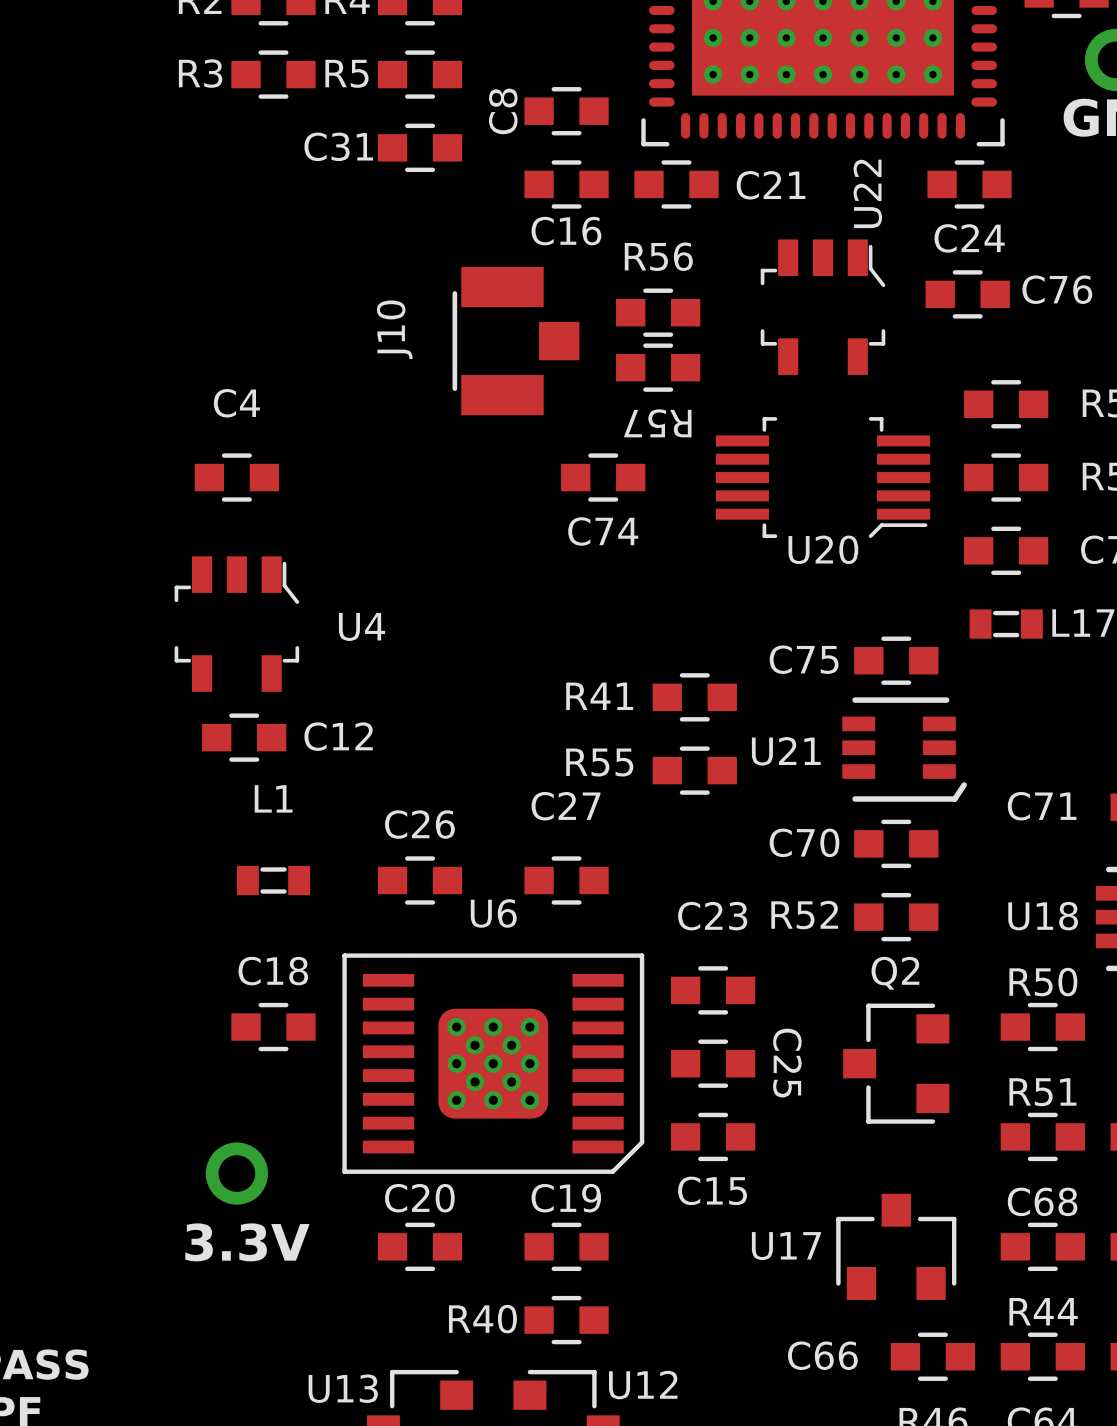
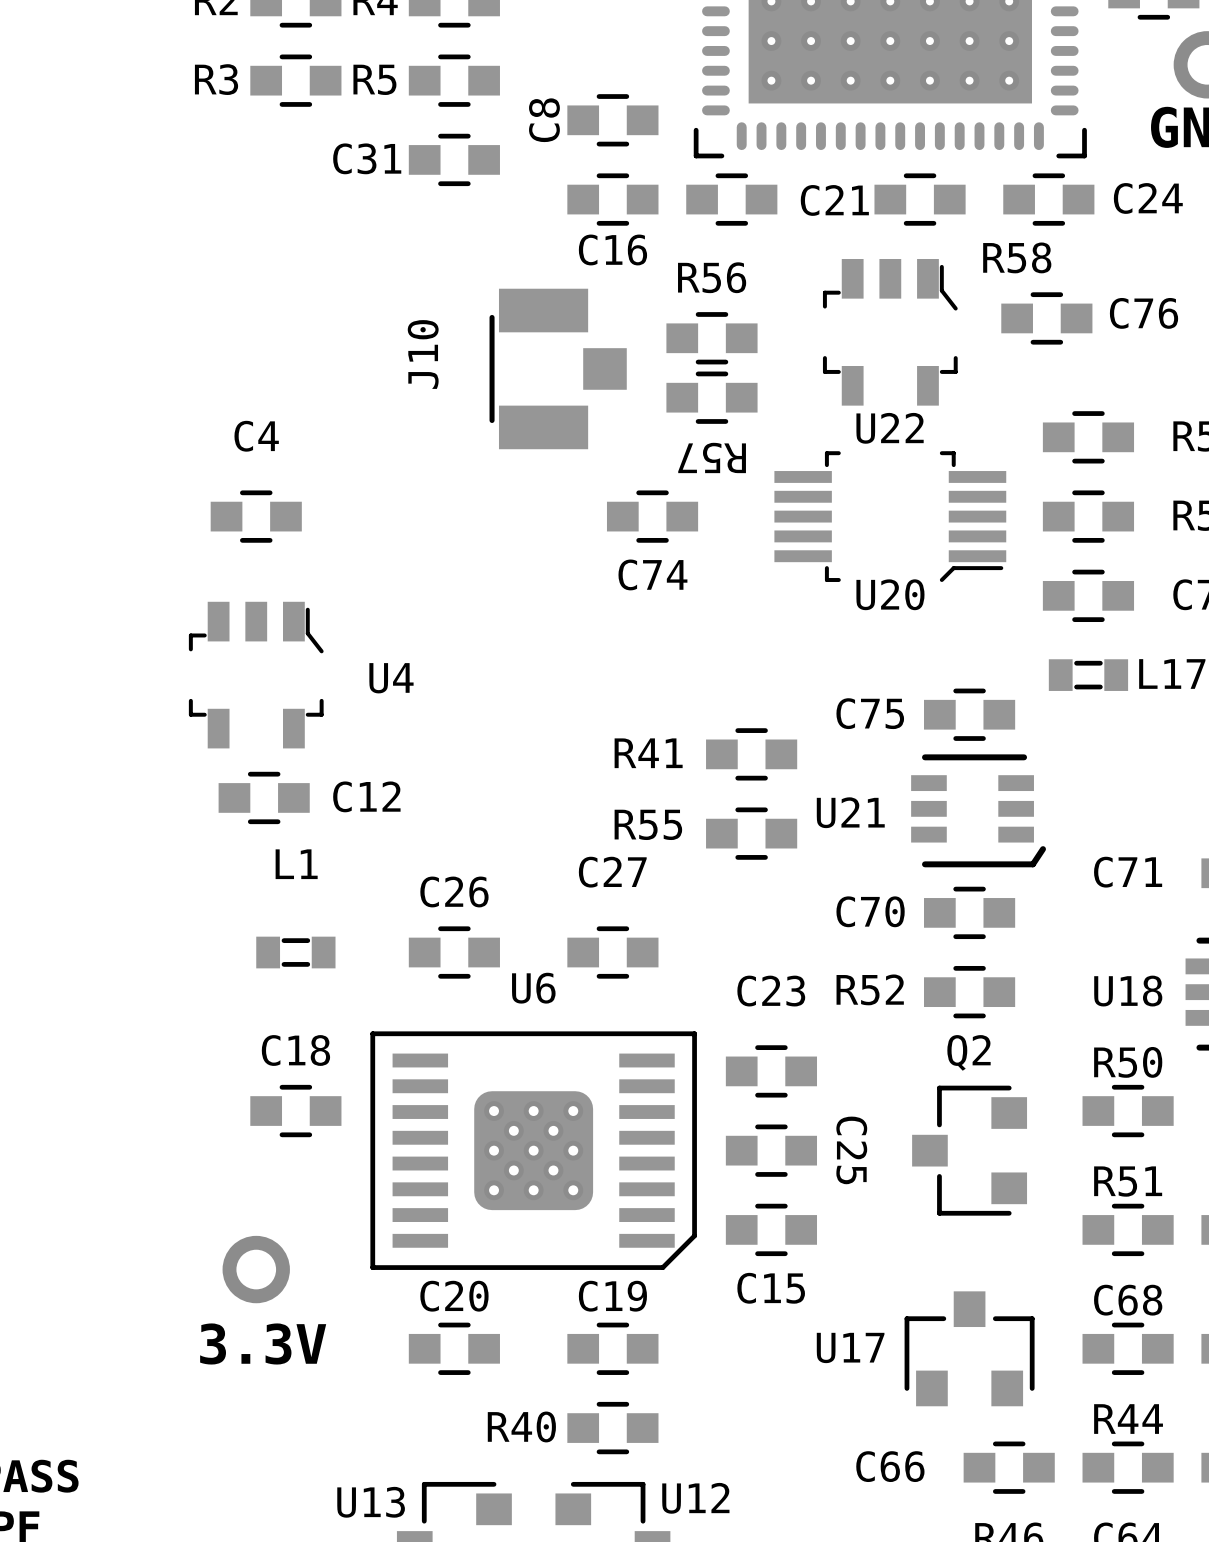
R58: none -> (920, 199)
U22 name rotation: 0° (867, 193) -> 90° clockwise (890, 428)
U22 name position: U22 (867, 193) -> U22 (890, 428)
C24 name position: C24 (969, 238) -> C24 (1148, 198)

